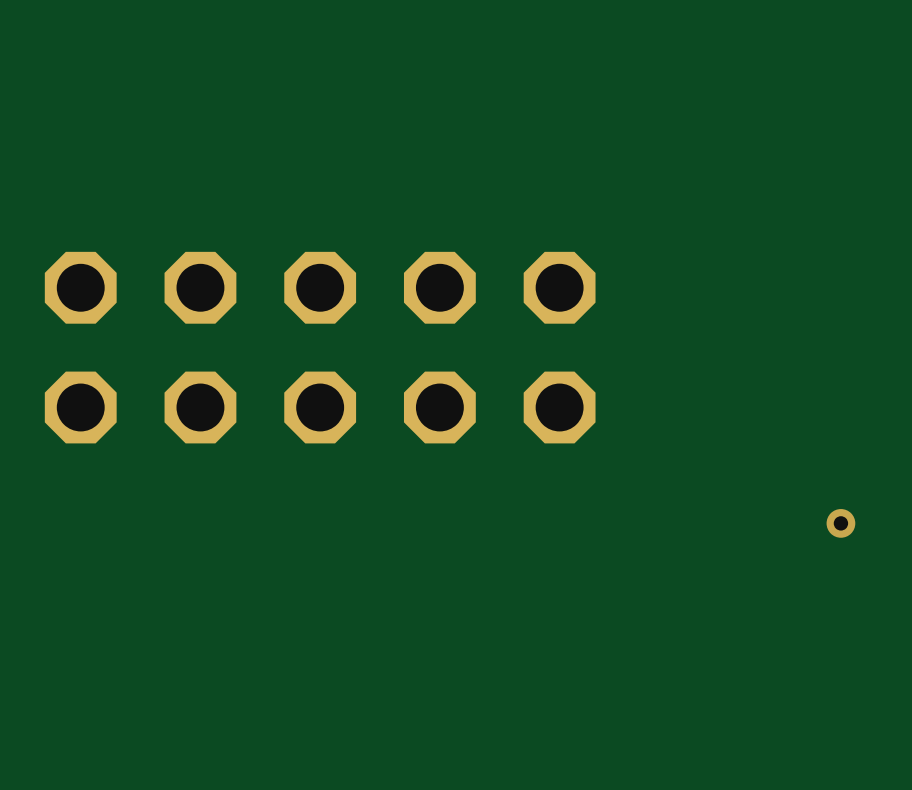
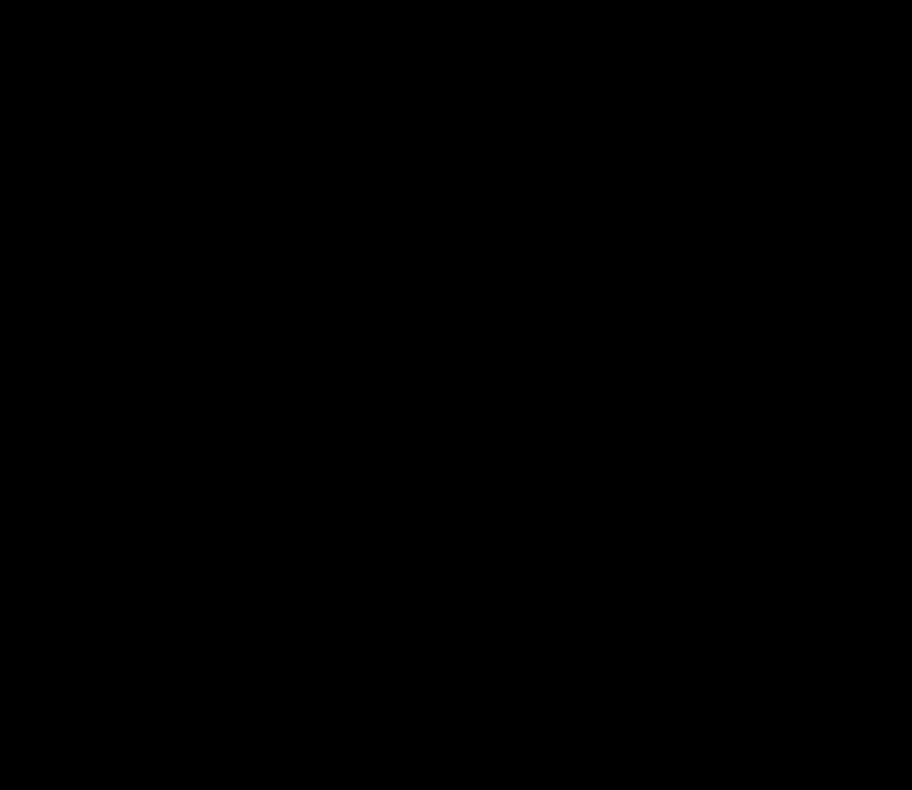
part: (320, 347) -> none
via: (840, 523) -> none

